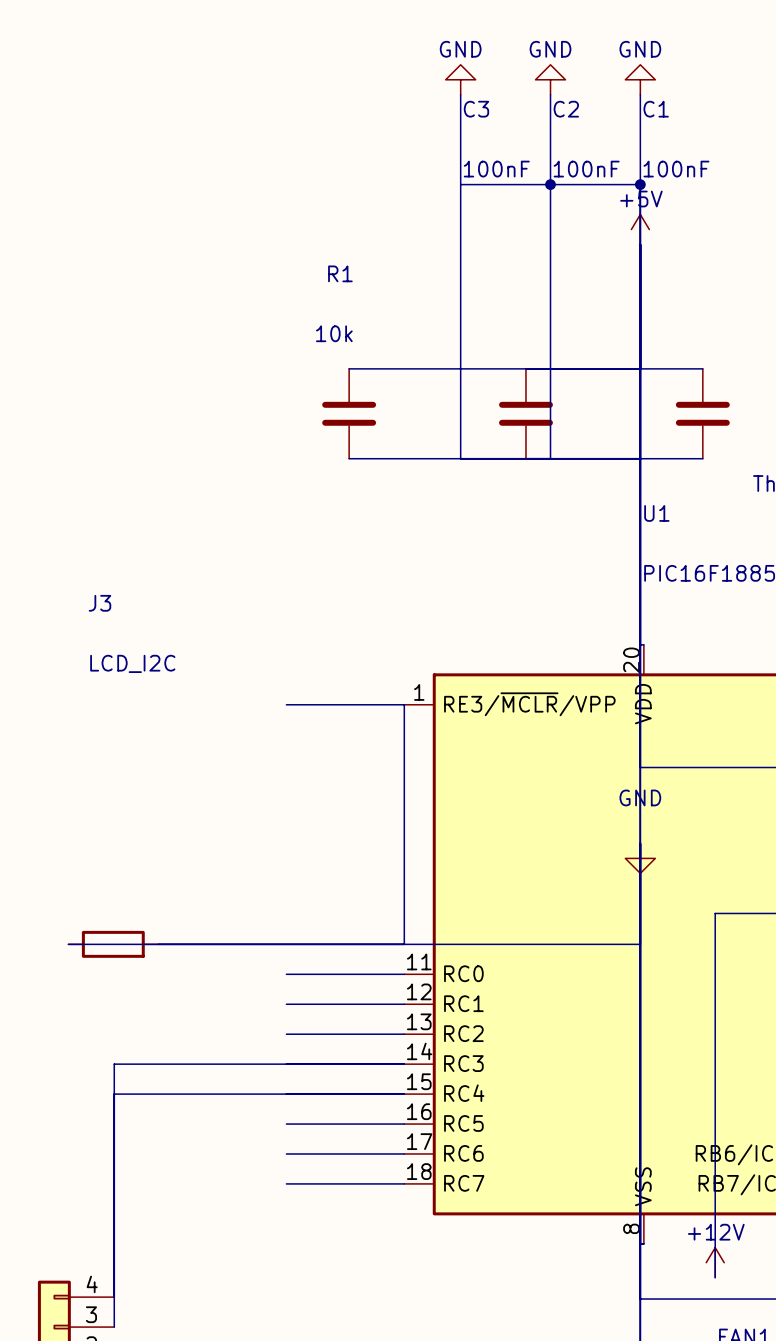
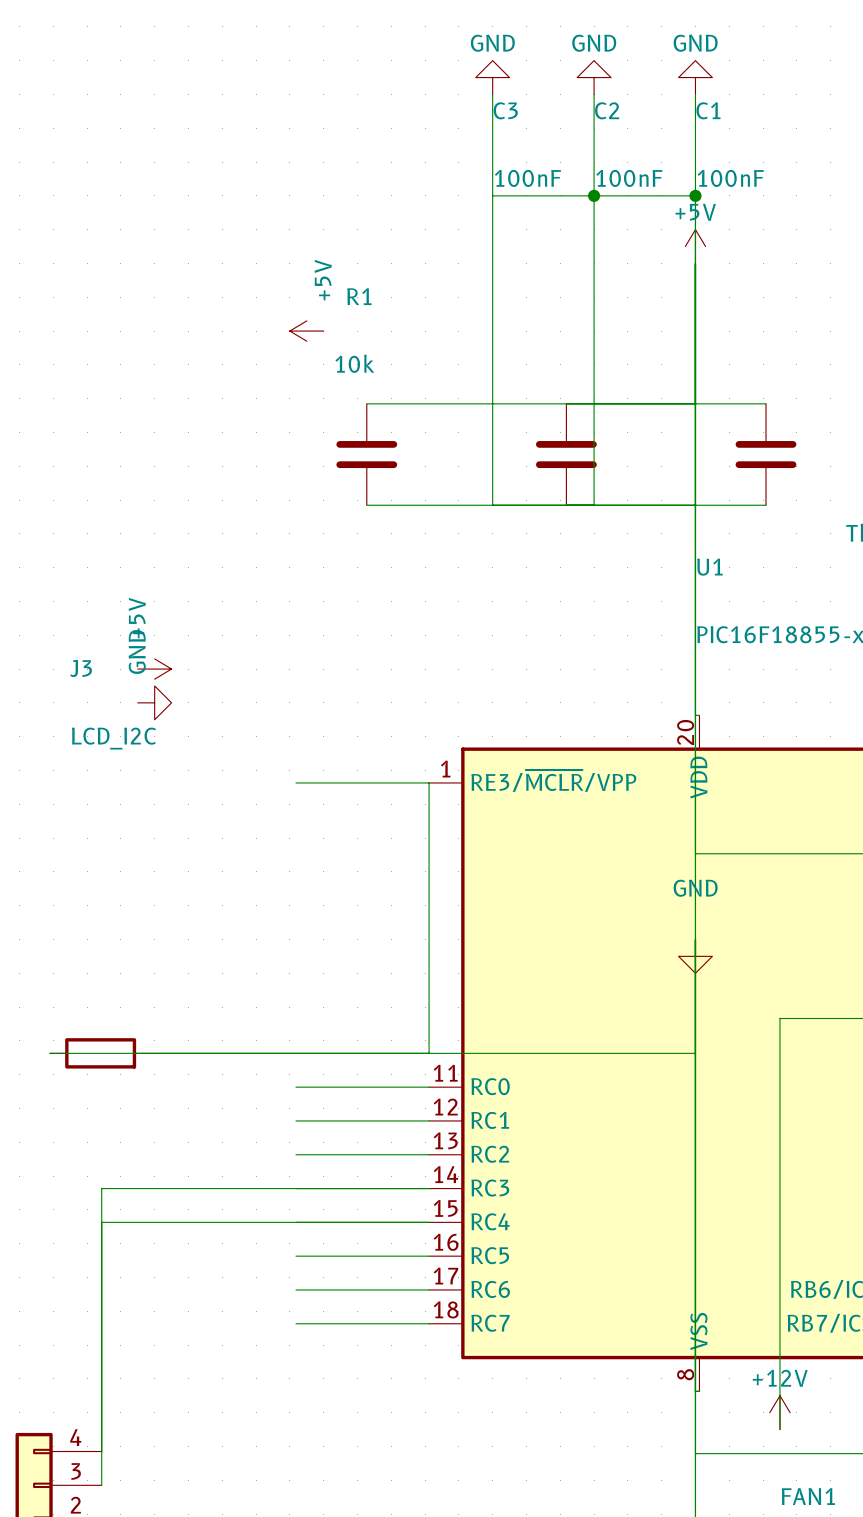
power symbol: none -> +5V (306, 331)
power symbol: none -> +5V (154, 669)
power symbol: none -> GND (154, 702)

